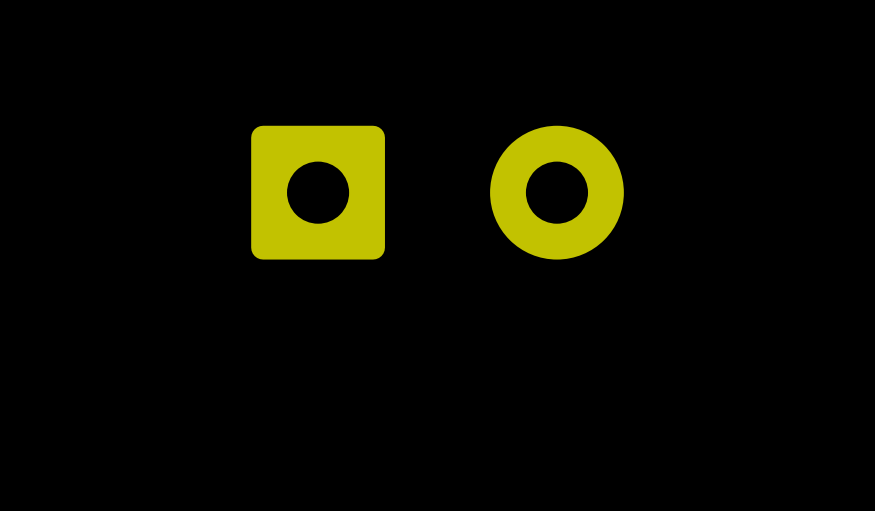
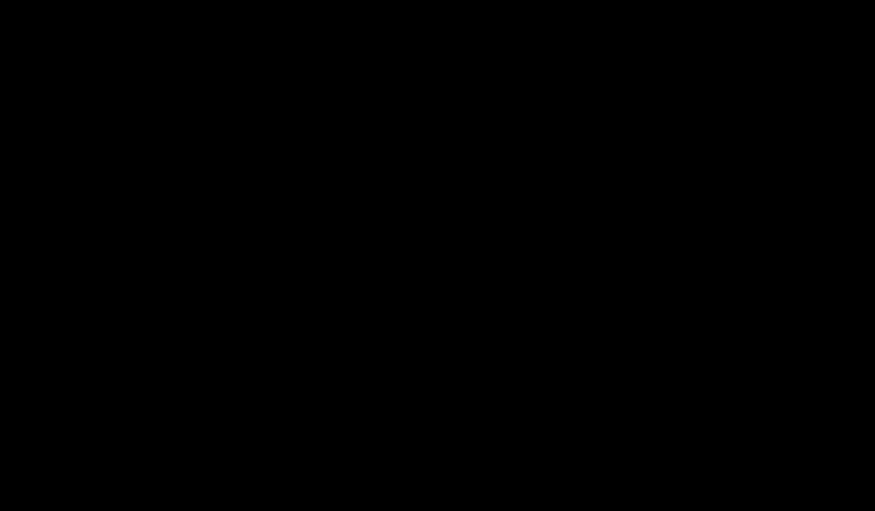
part: (437, 192) -> none

